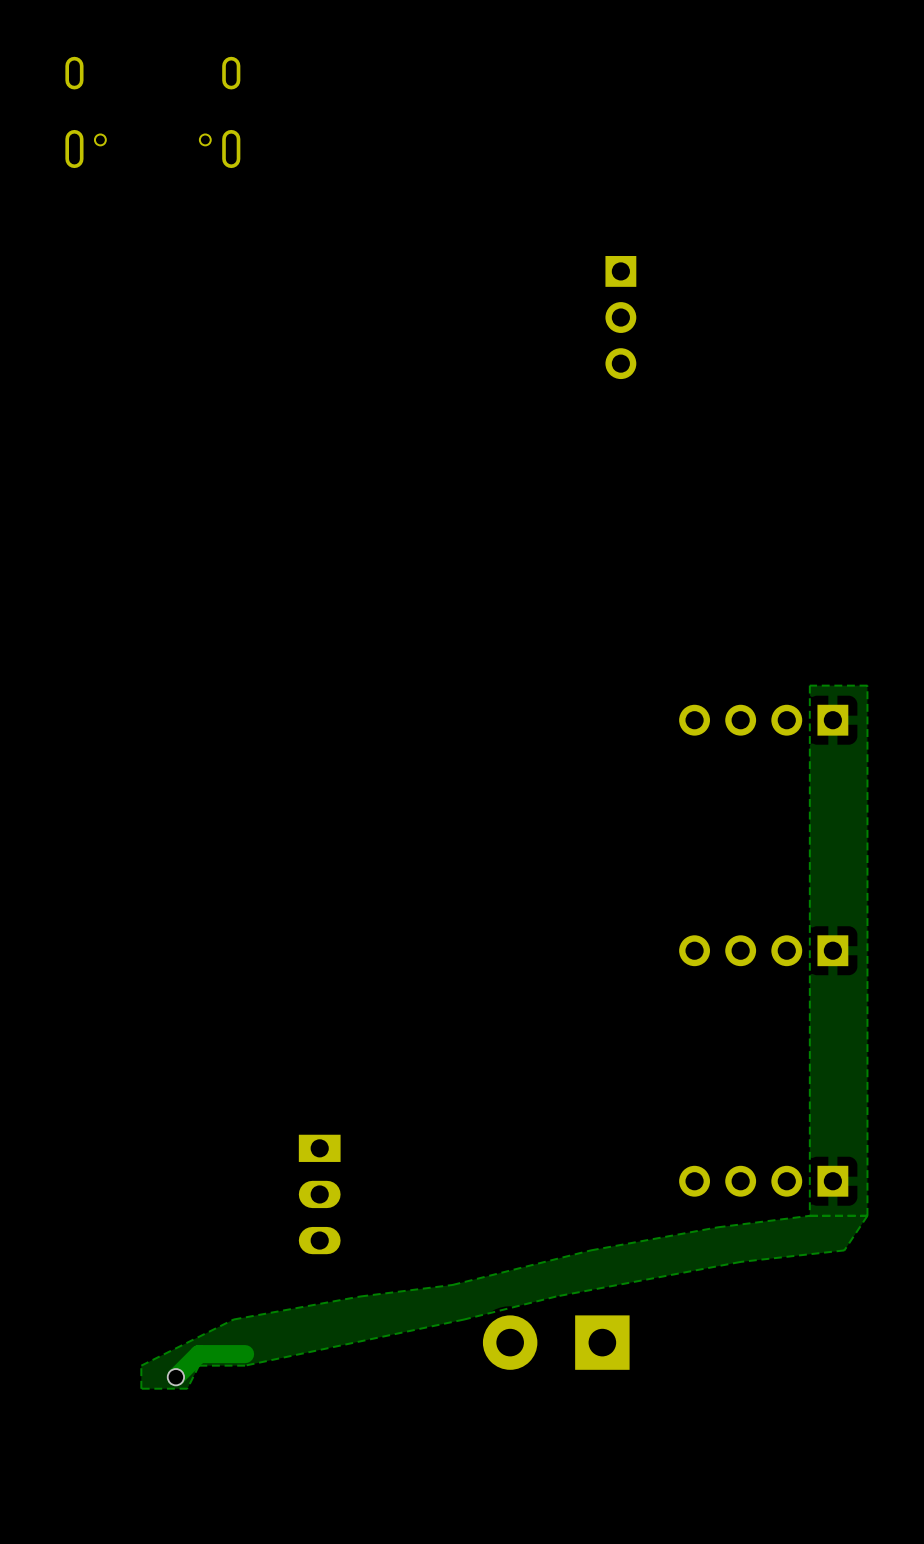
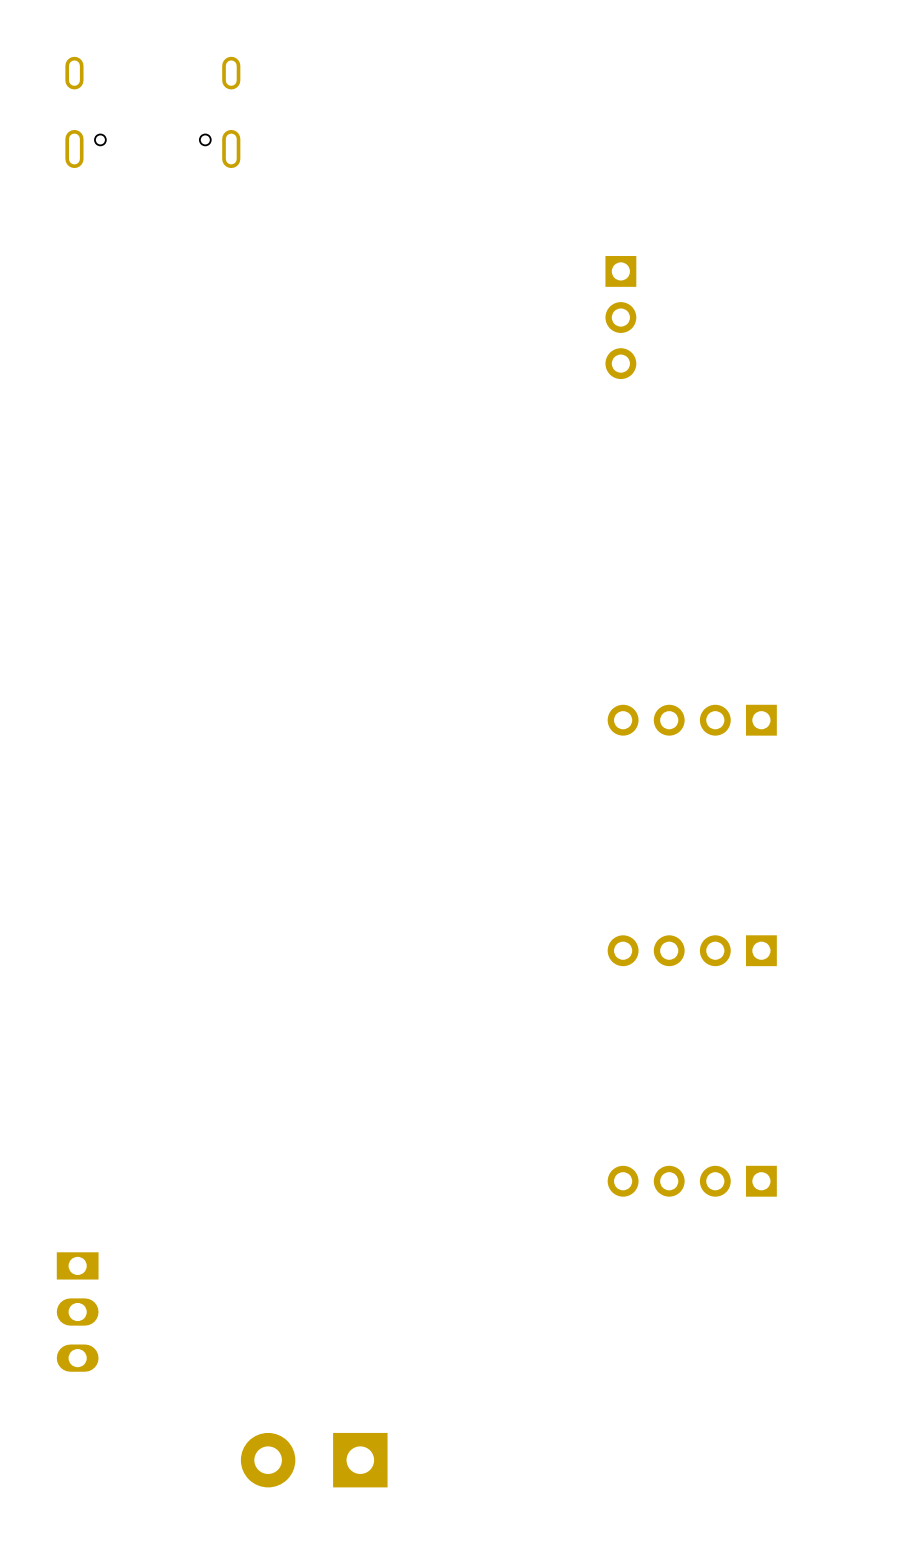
part position: (763, 720) -> (692, 720)
part position: (763, 950) -> (692, 950)
part position: (763, 1181) -> (692, 1181)
part position: (319, 1194) -> (77, 1312)
zone outline: (867, 1215) (867, 685) (809, 685) (809, 1215) -> none
zone outline: (867, 1215) (809, 1215) -> none
zone outline: (867, 1215) (844, 1250) (740, 1261) (556, 1296) (464, 1319) (245, 1365) (198, 1365) (187, 1388) (141, 1388) (141, 1365) (233, 1319) (360, 1296) (452, 1284) (590, 1250) (717, 1227) (809, 1215) -> none
part position: (556, 1342) -> (314, 1460)
track: (245, 1354) (198, 1354) (175, 1377) -> none
via: (175, 1377) -> none

